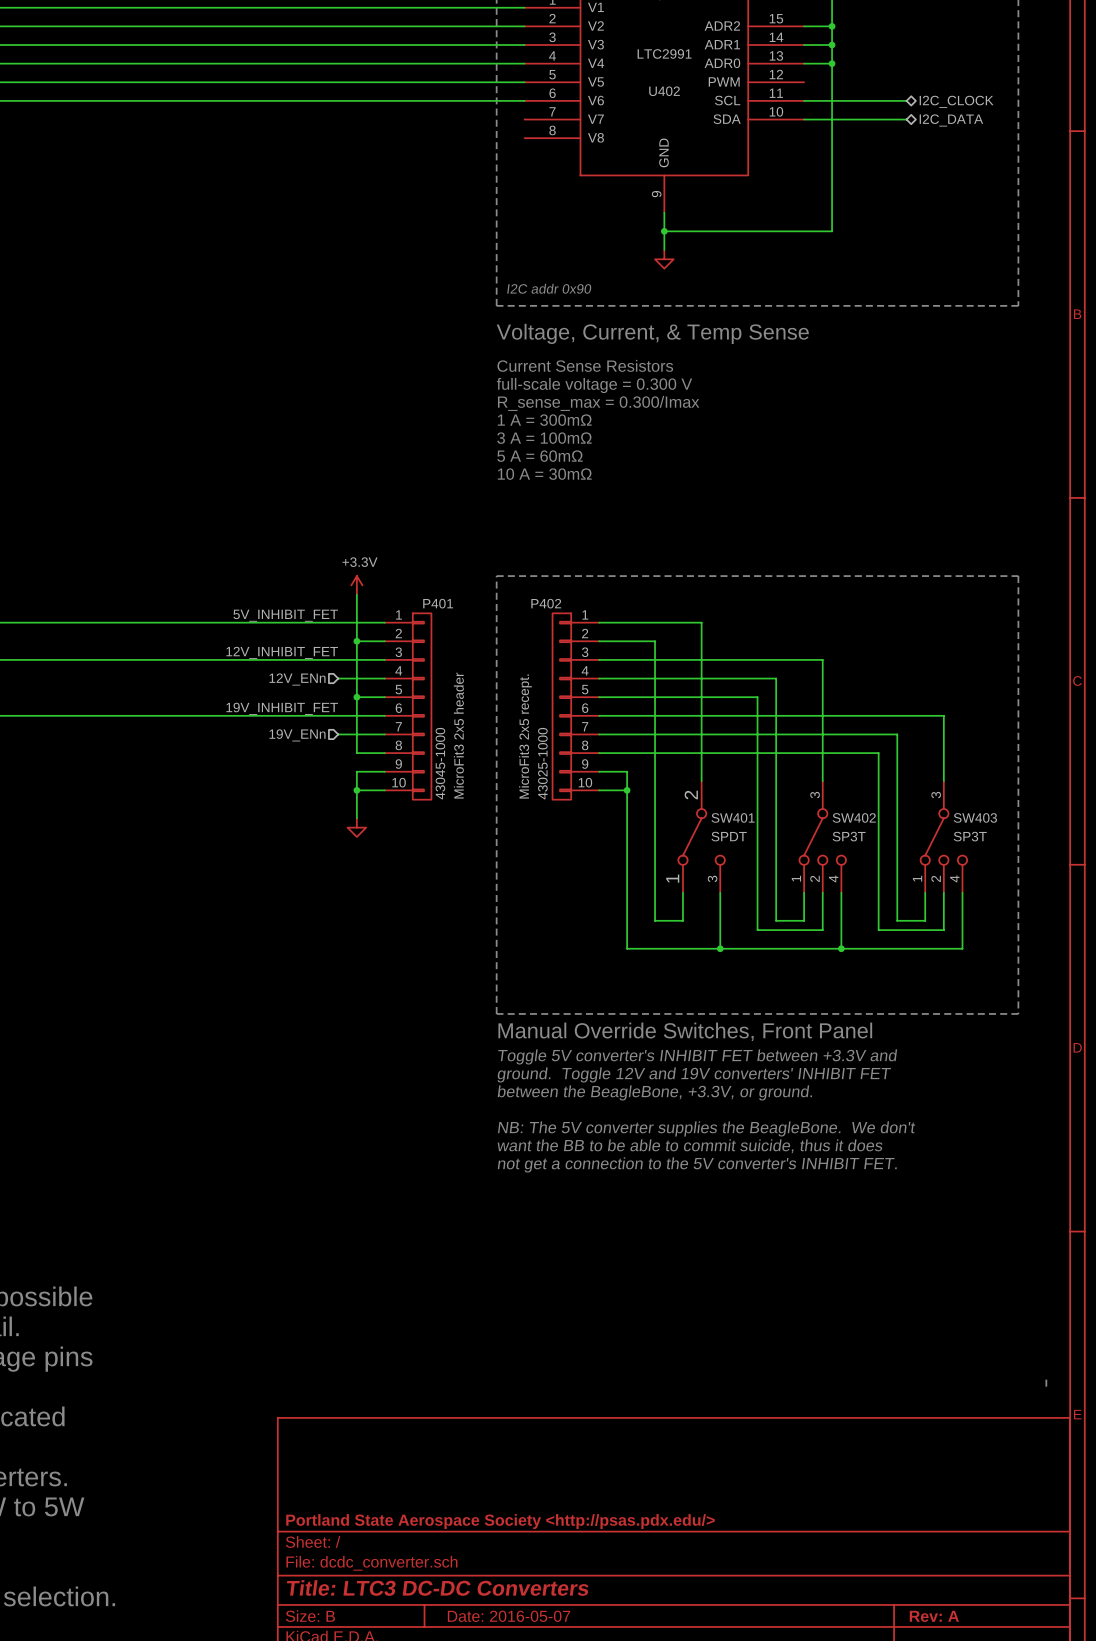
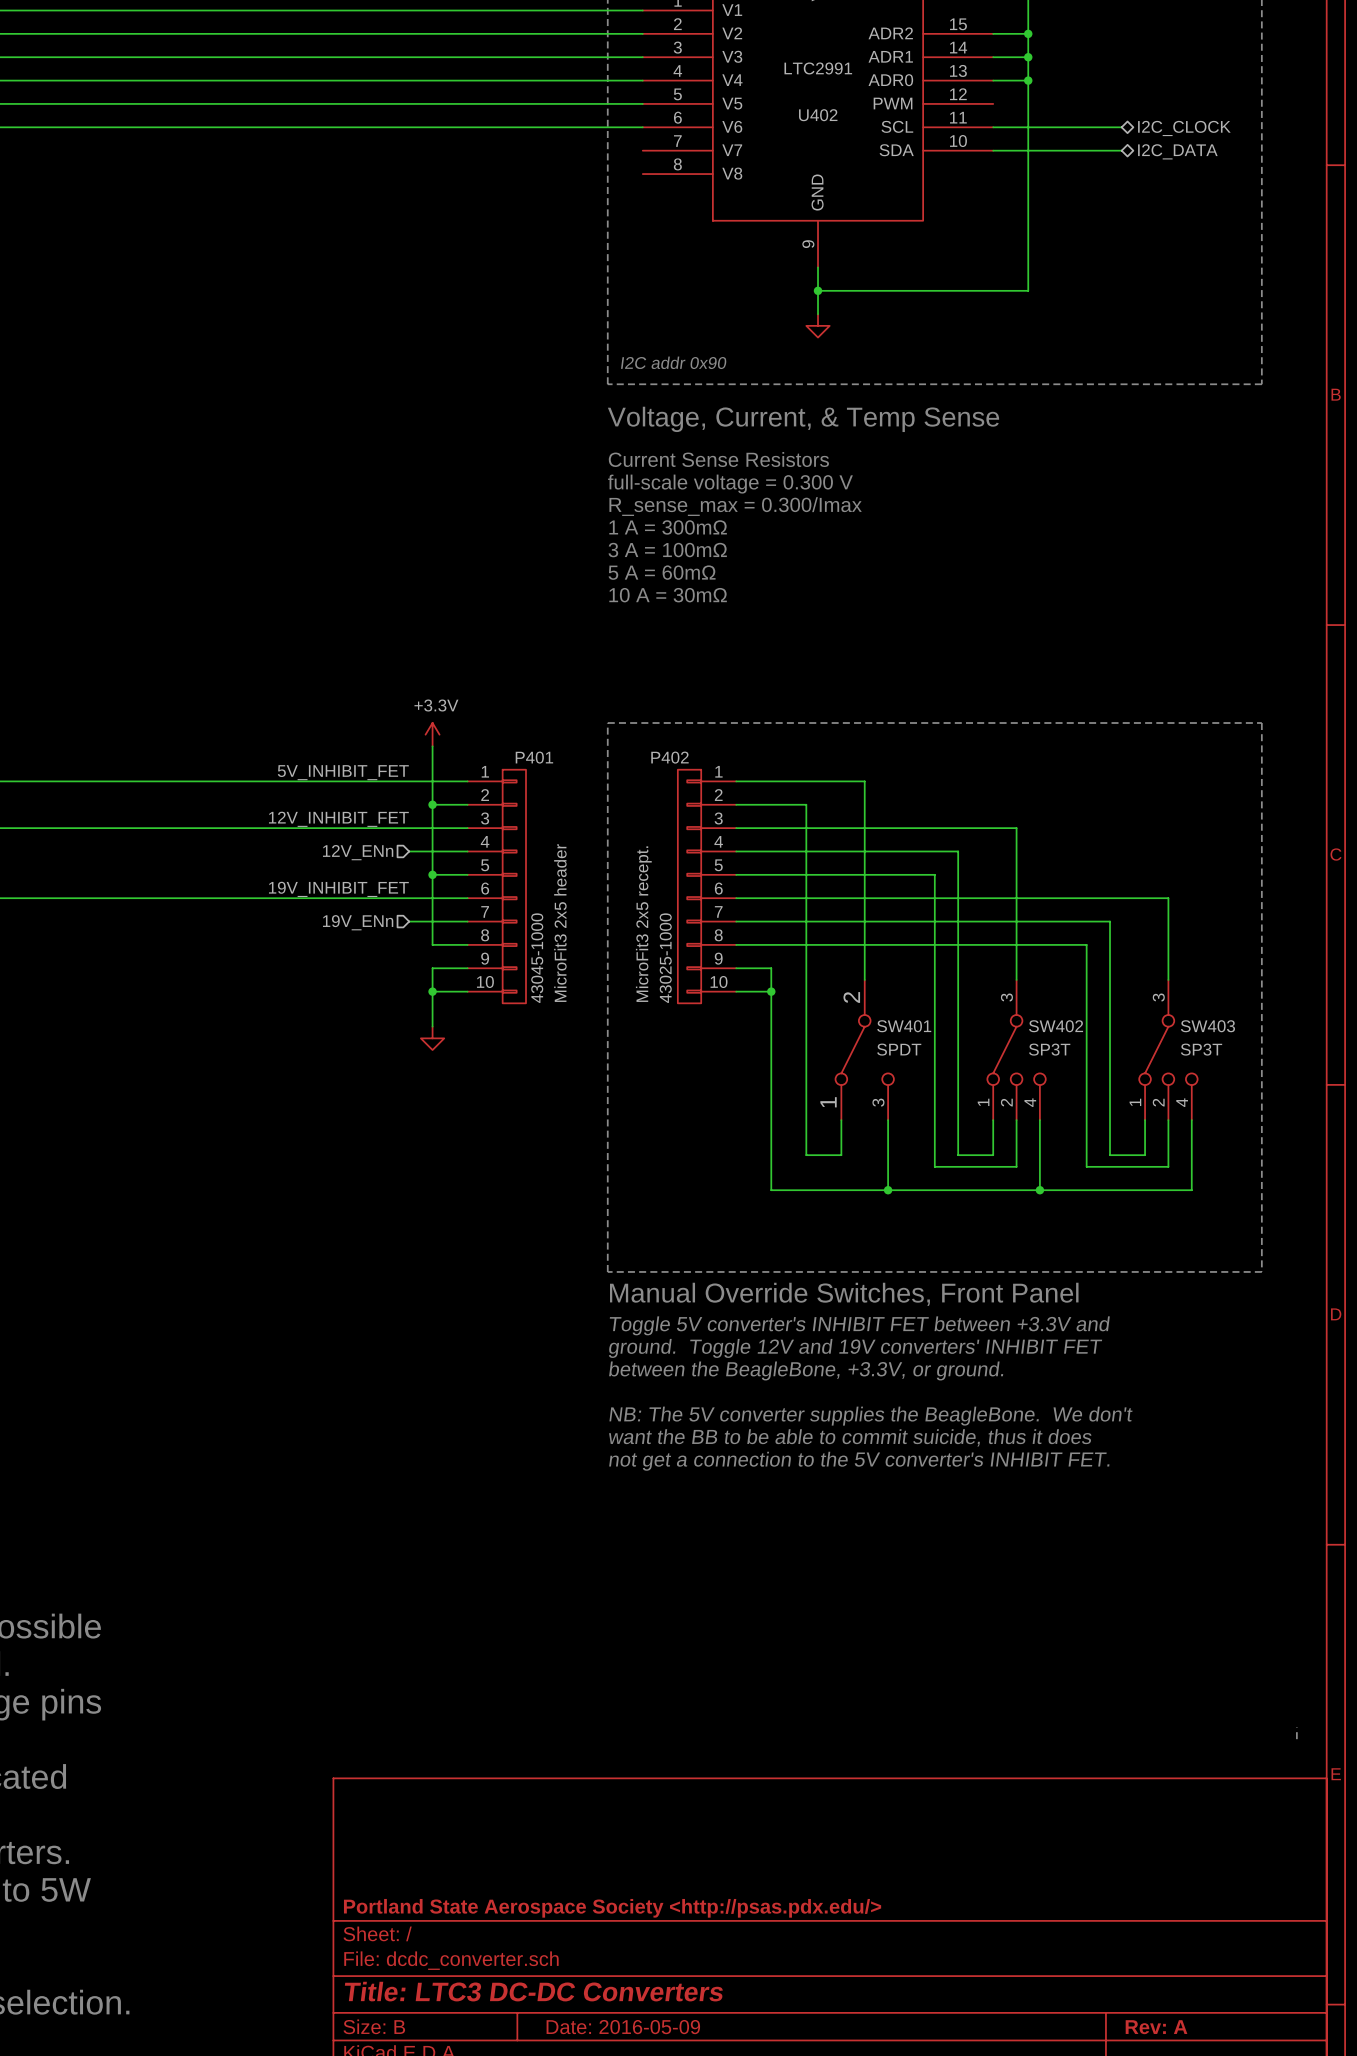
title block: Date: 2016-05-07 (509, 1616) -> Date: 2016-05-09 (623, 2027)

